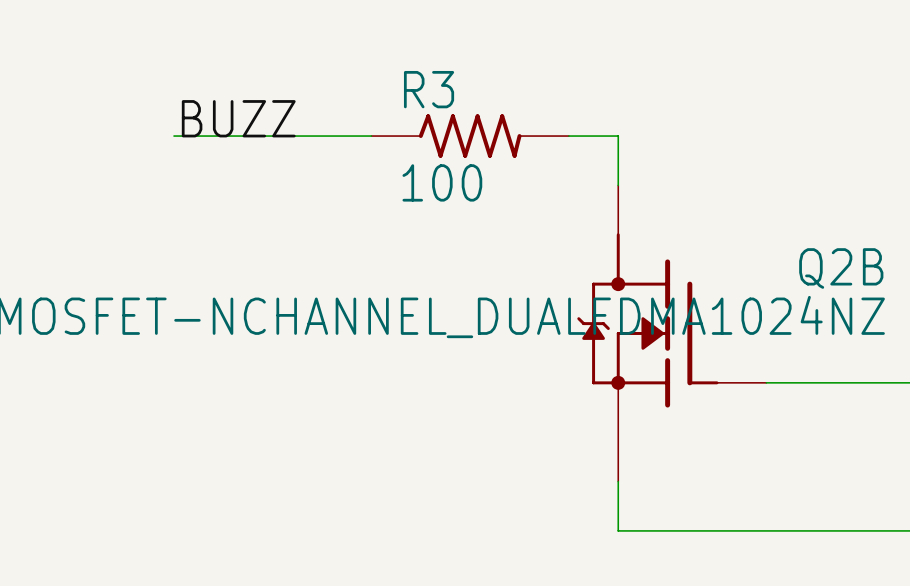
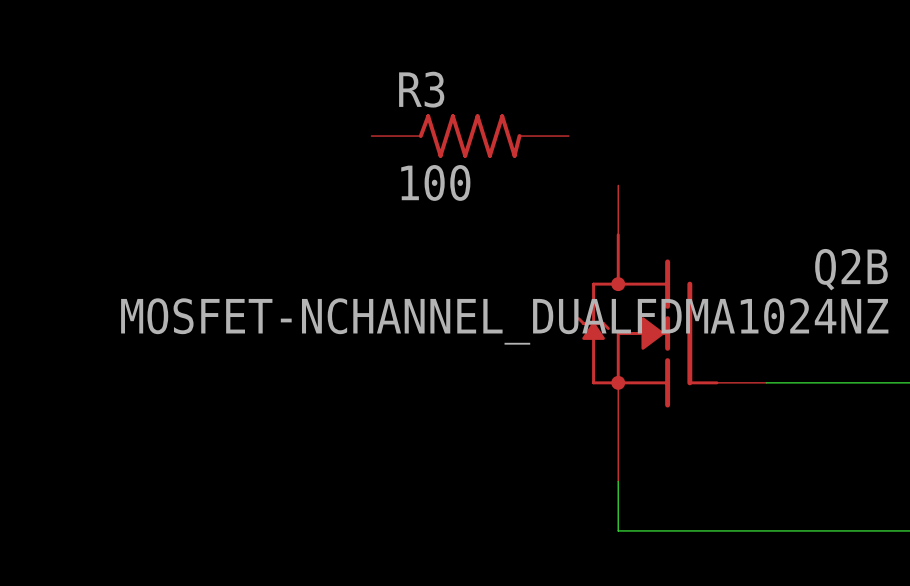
label: BUZZ (238, 118) -> none
wire: (173, 136) (371, 136) -> none
wire: (568, 136) (618, 136) (618, 185) -> none

